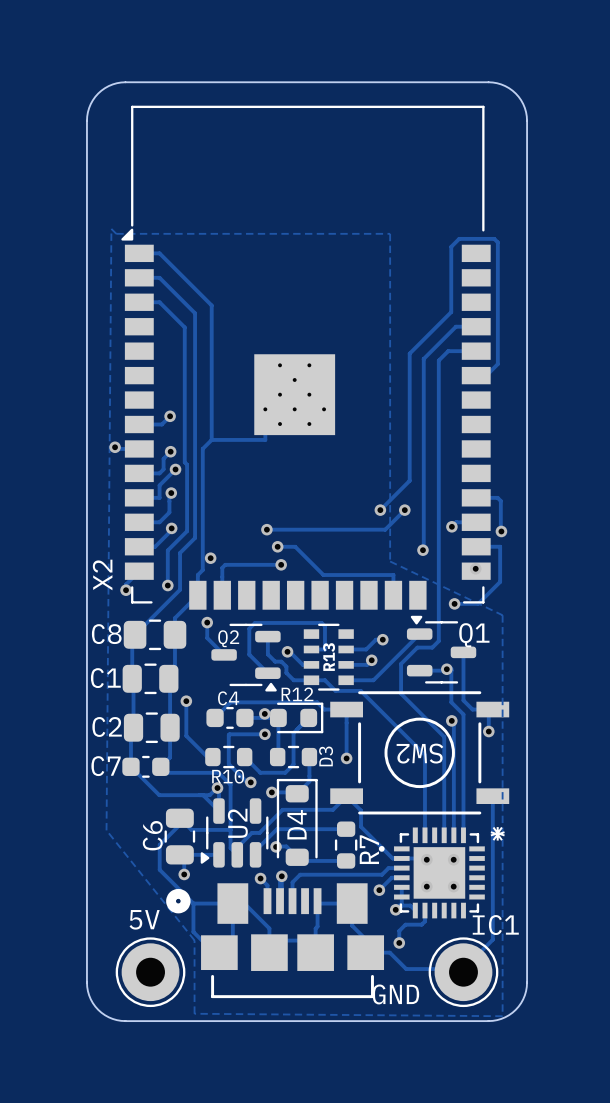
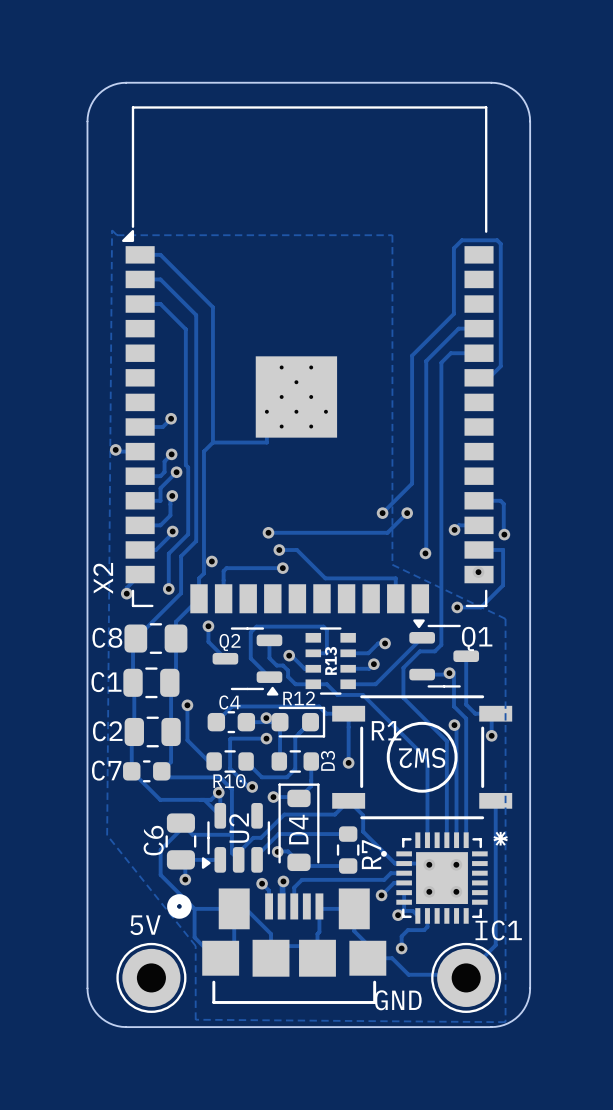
text: none -> R1 (386, 730)

